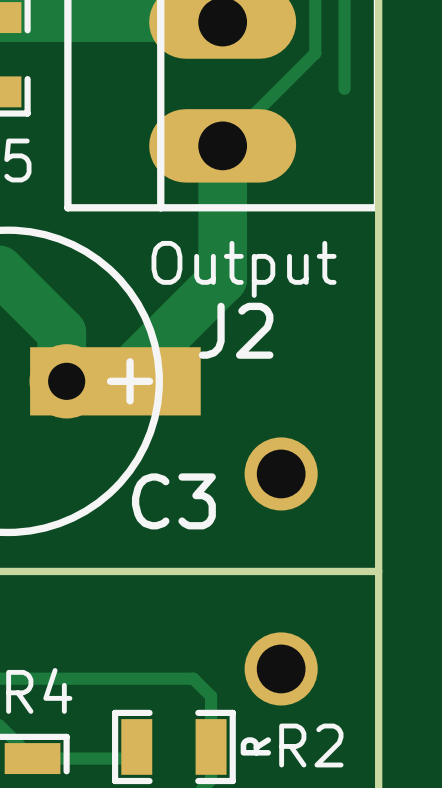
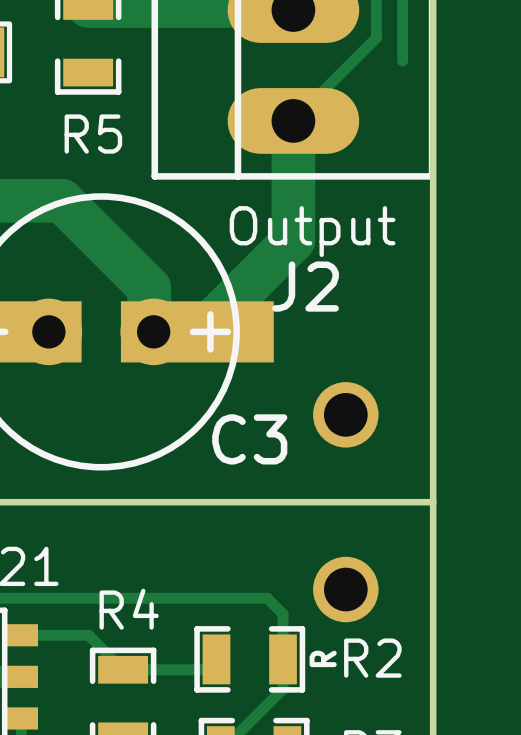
track: (344, 79) (344, 88) -> none

